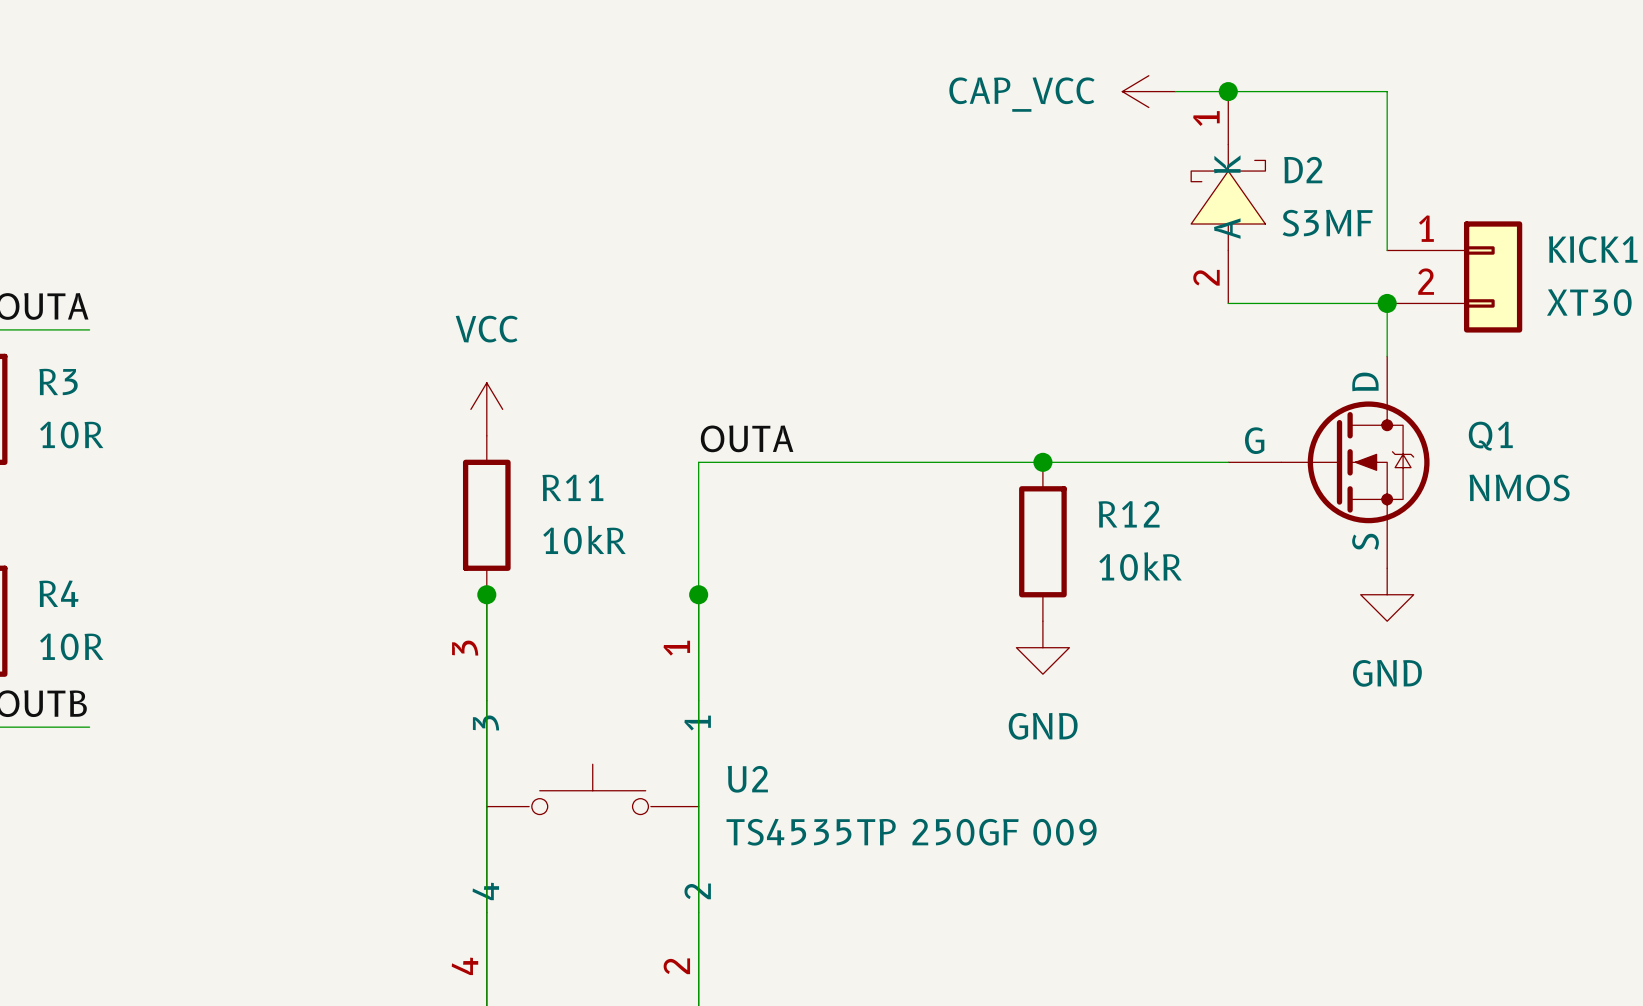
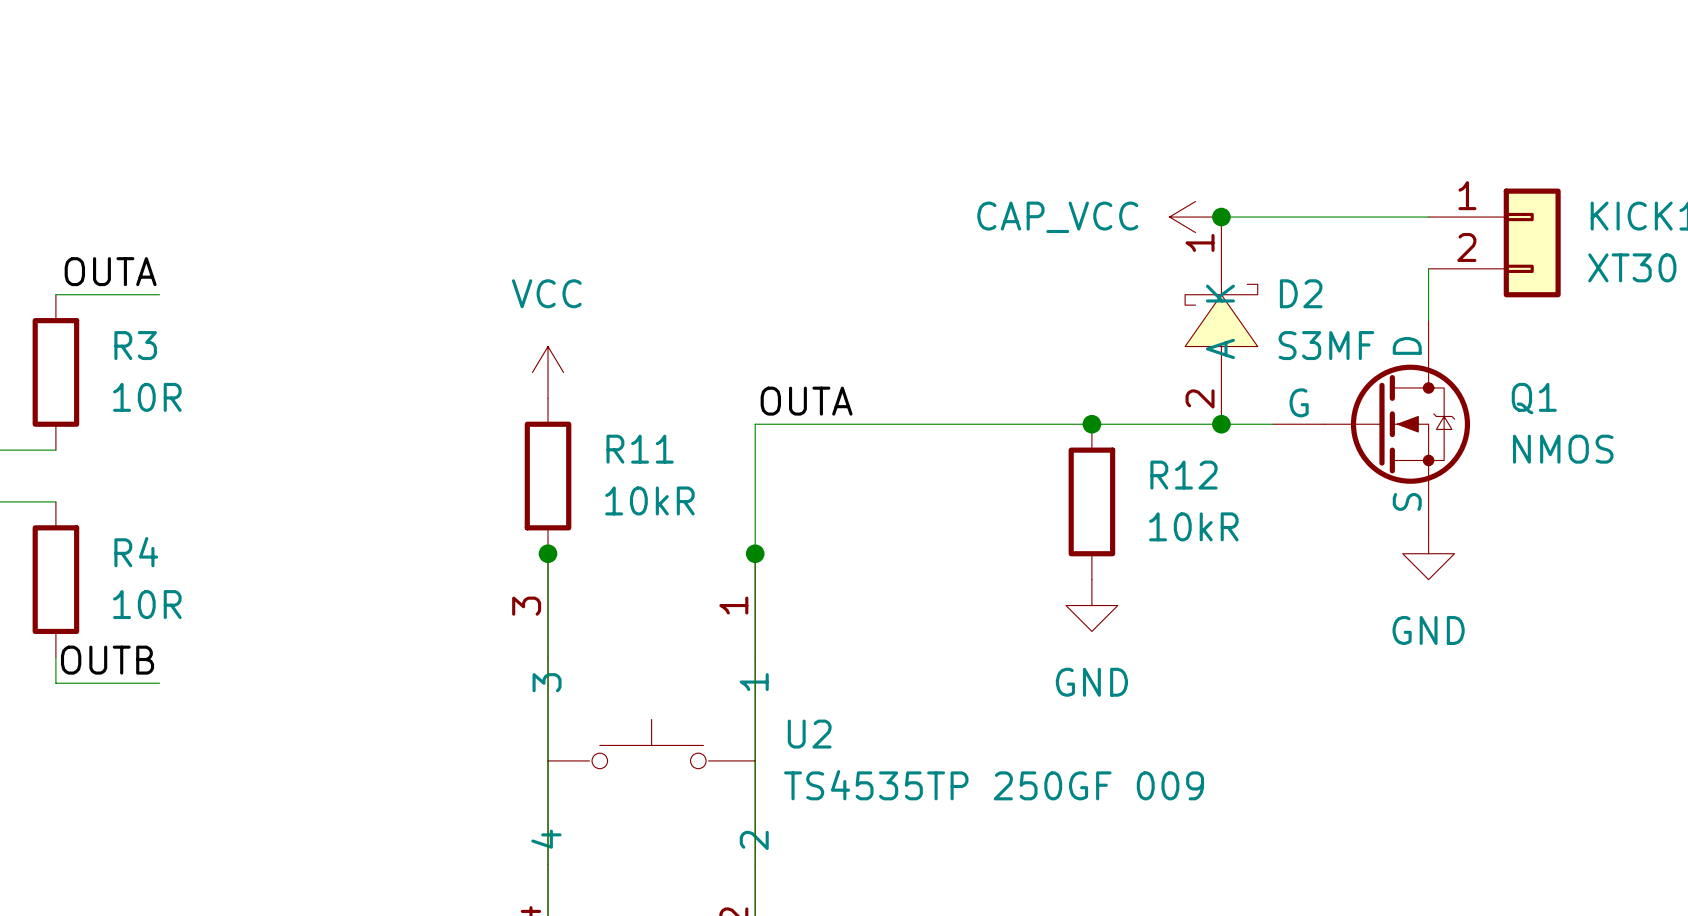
power symbol position: CAP_VCC (1148, 91) -> CAP_VCC (1195, 217)
wire: (1175, 91) (1387, 91) (1387, 250) -> (1221, 217) (1428, 217)
junction: (1228, 91) -> none
D2 position: (1228, 197) -> (1221, 320)
junction: none -> (1221, 217)
wire: (1228, 303) (1387, 303) -> none
junction: (1387, 303) -> none
junction: none -> (1221, 424)

